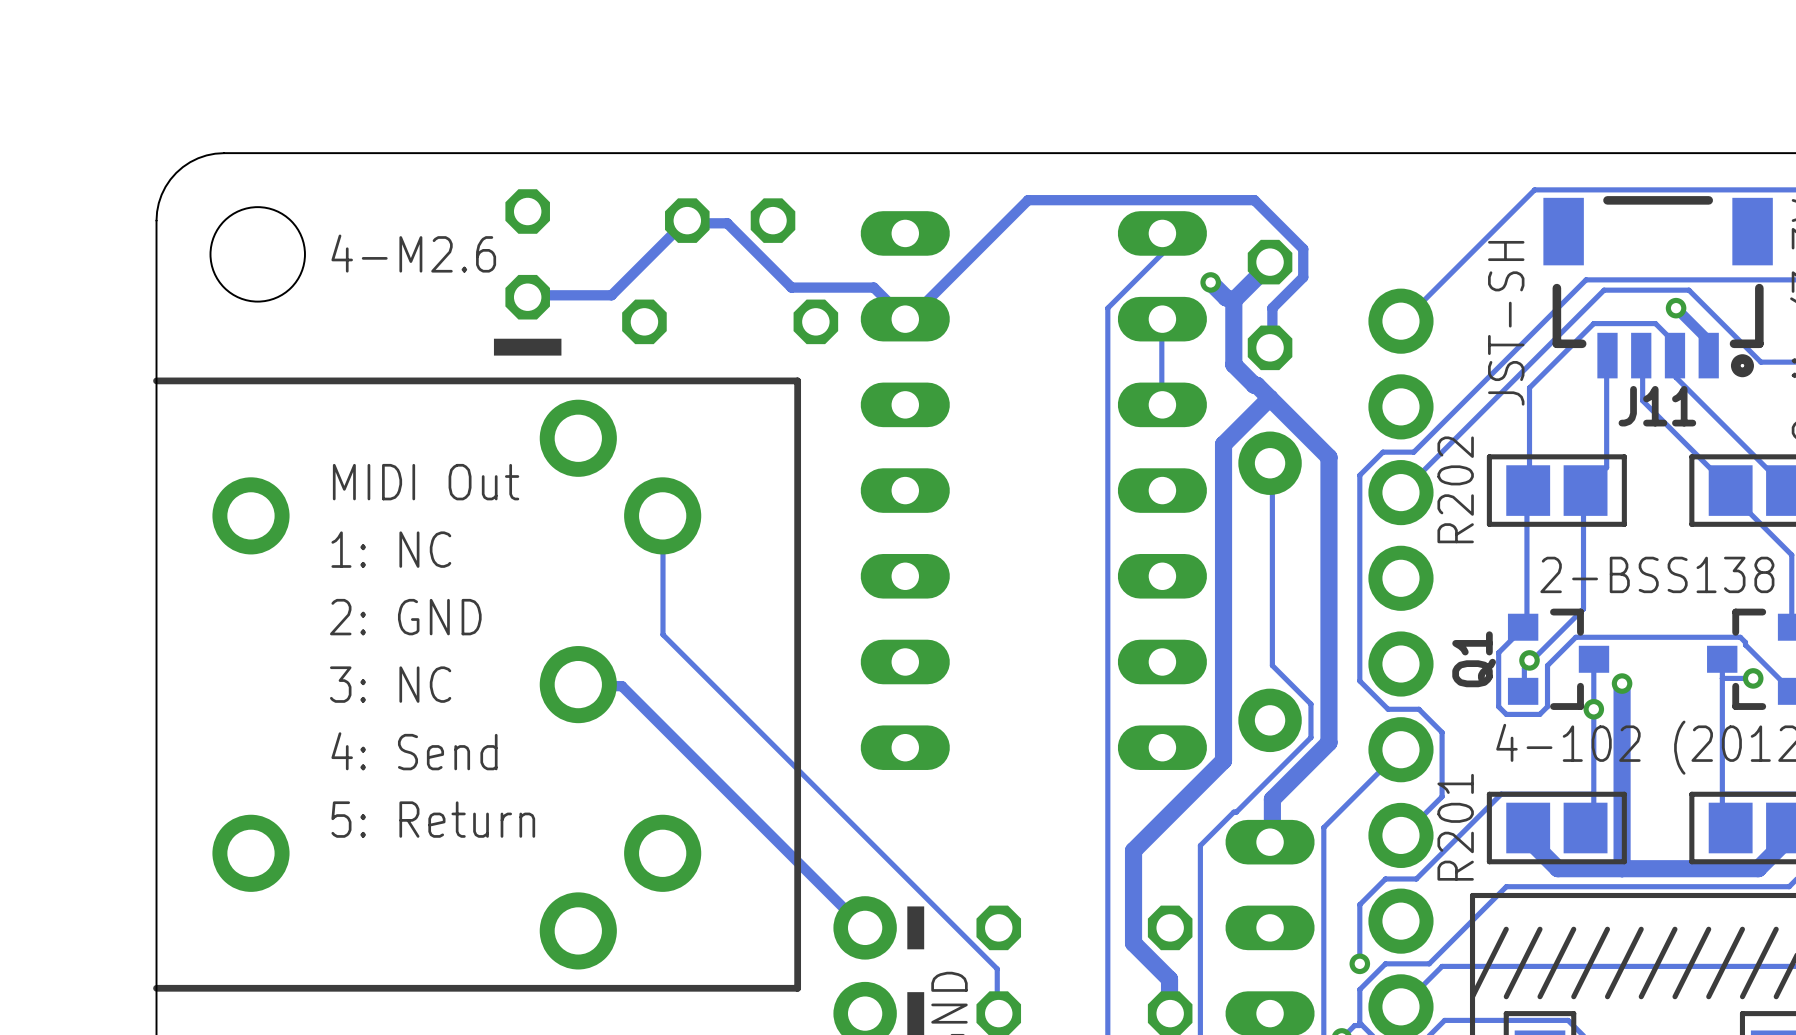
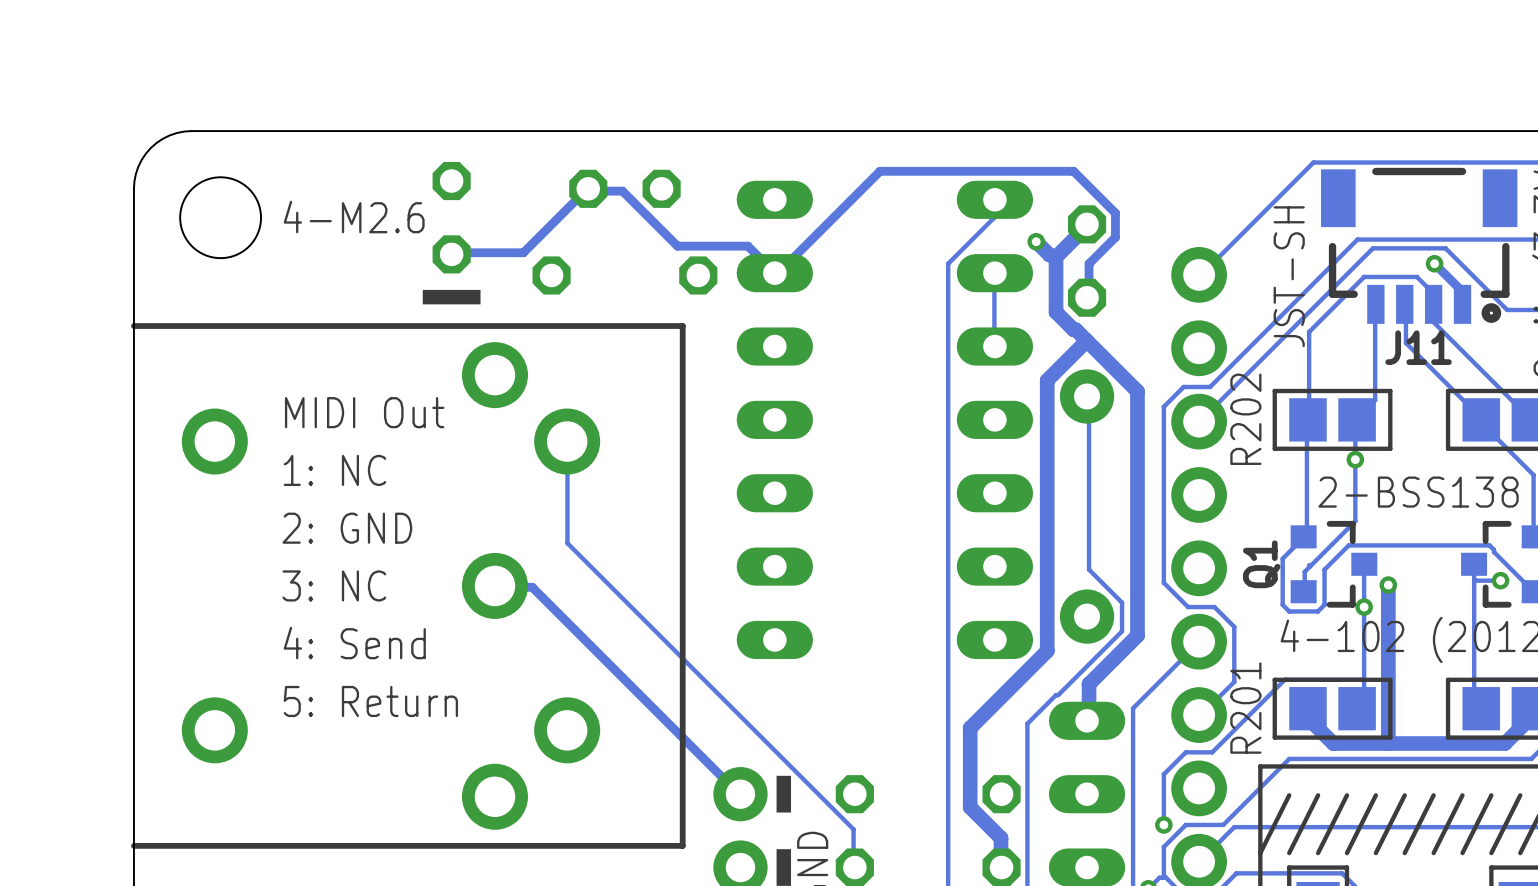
via position: (1529, 660) -> (1355, 459)

